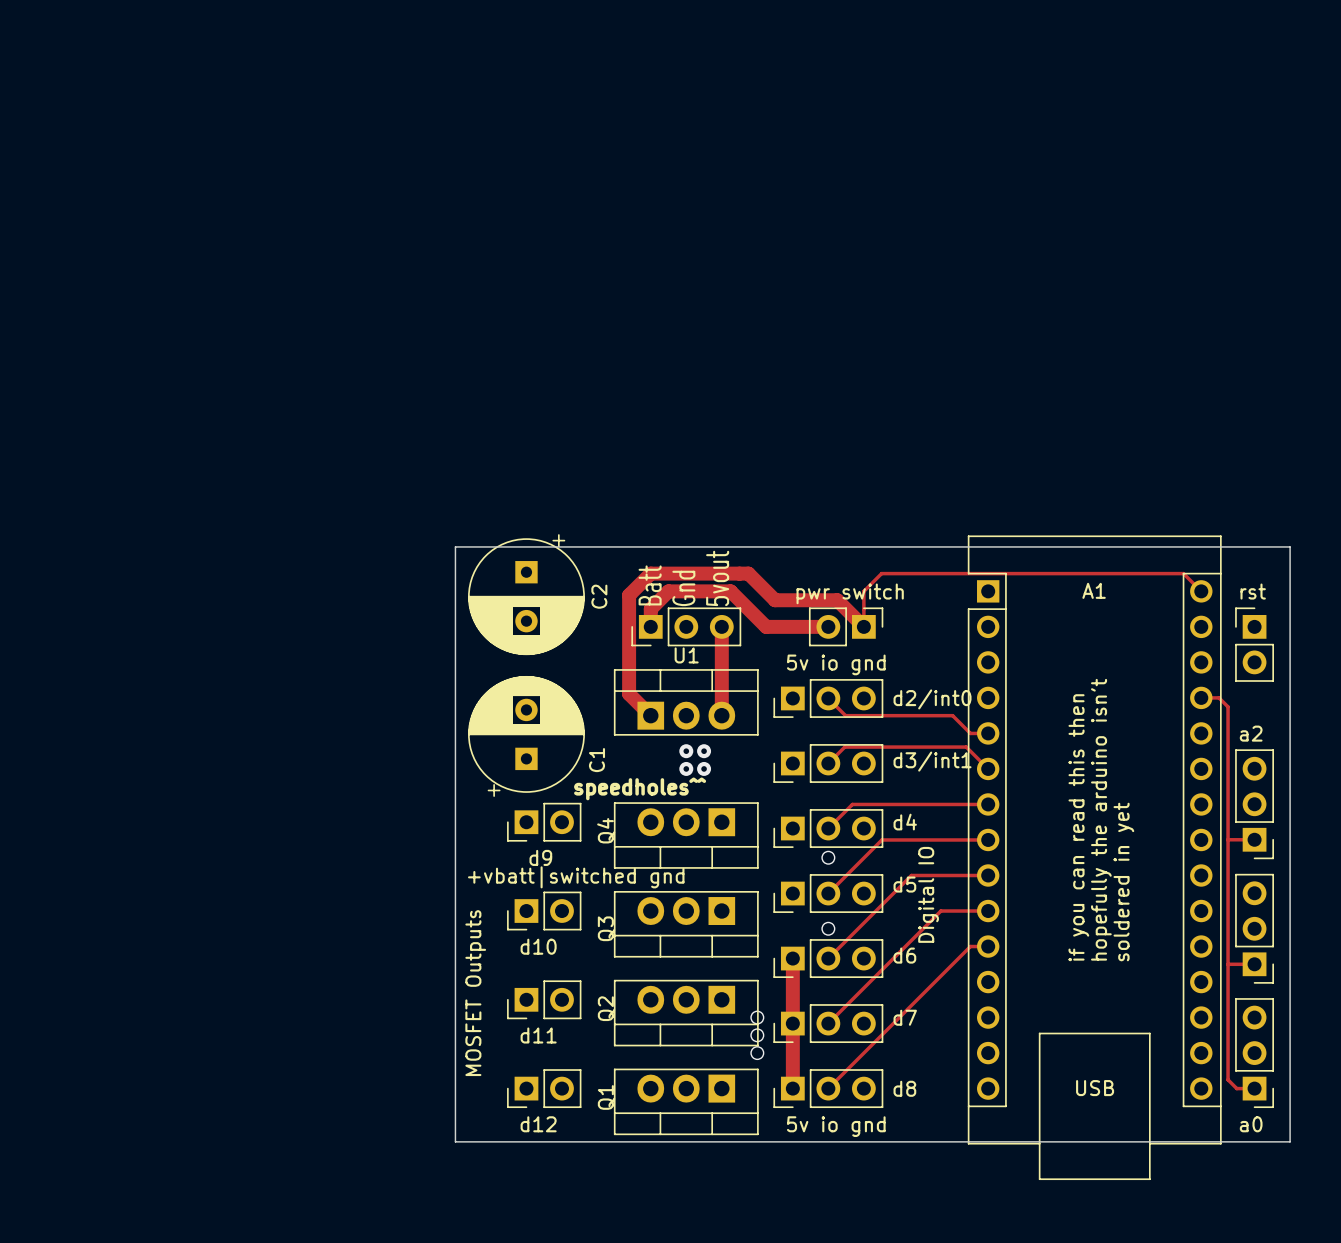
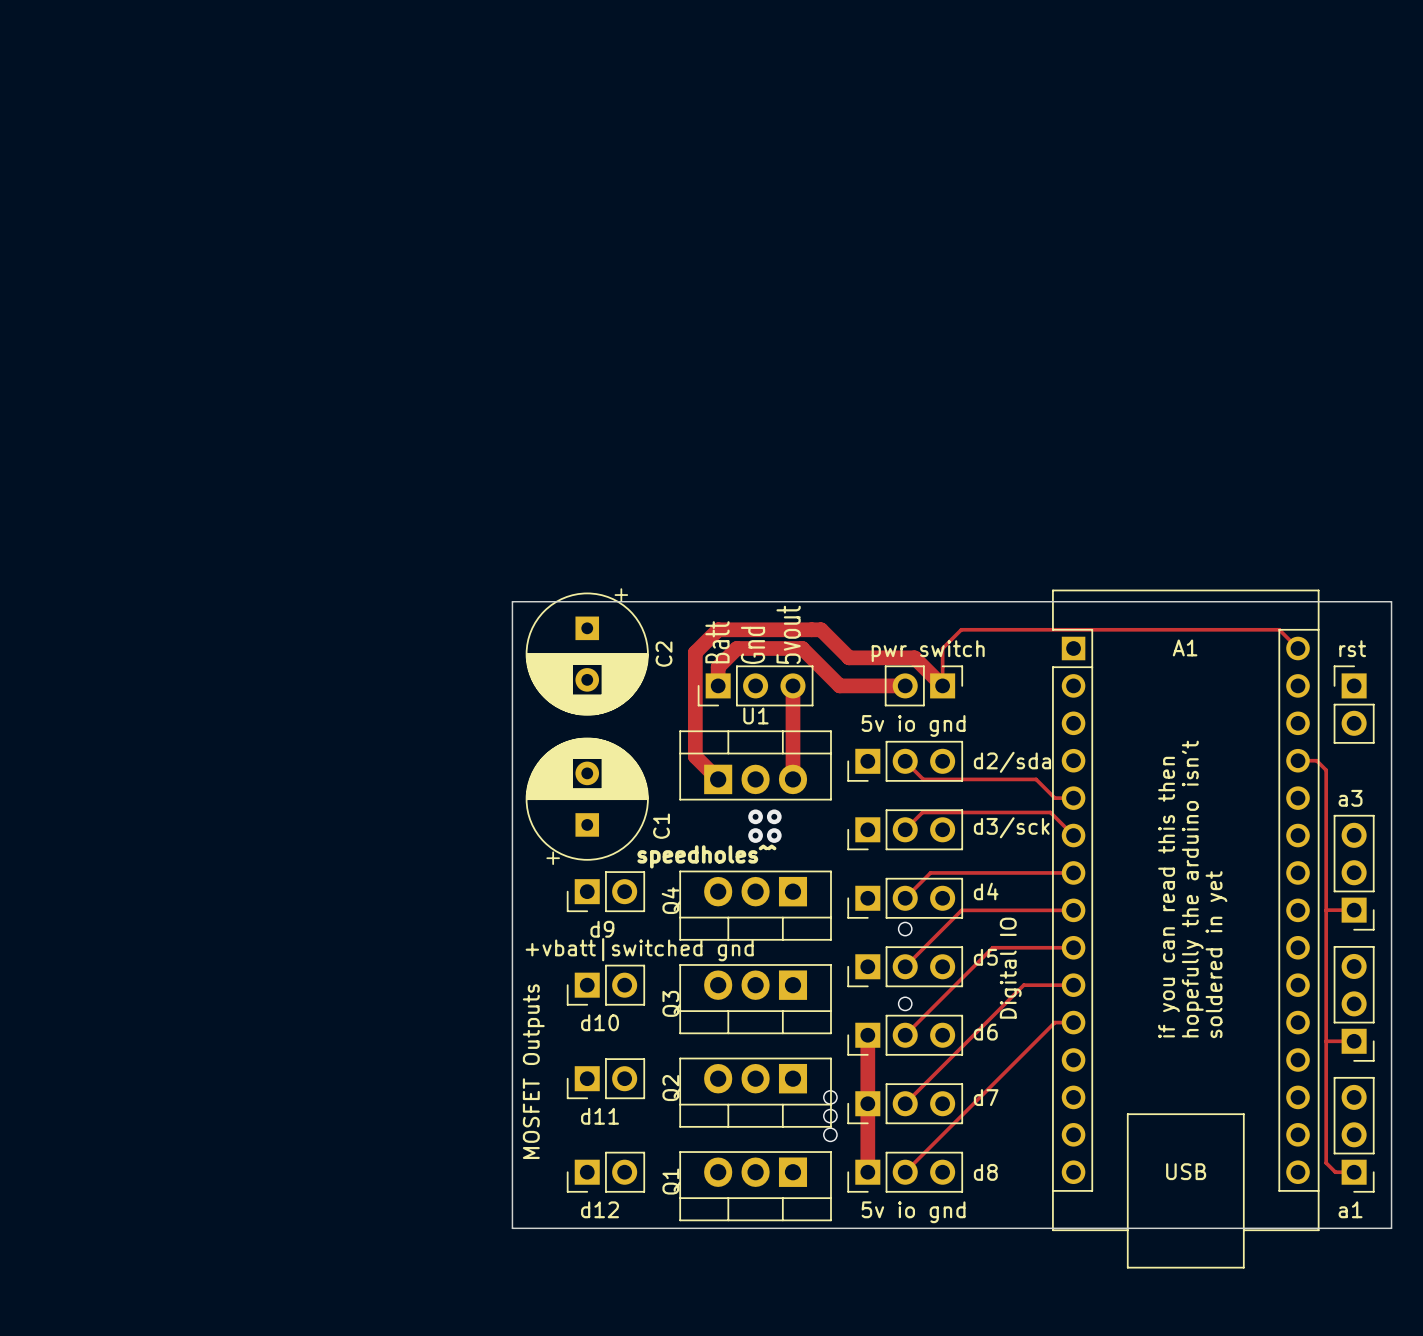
text: d2/int0 (932, 699) -> d2/sda (1012, 762)
text: a2 (1251, 733) -> a3 (1350, 798)
text: d3/int1 (932, 761) -> d3/sck (1011, 827)
text: a0 (1251, 1124) -> a1 (1350, 1209)

